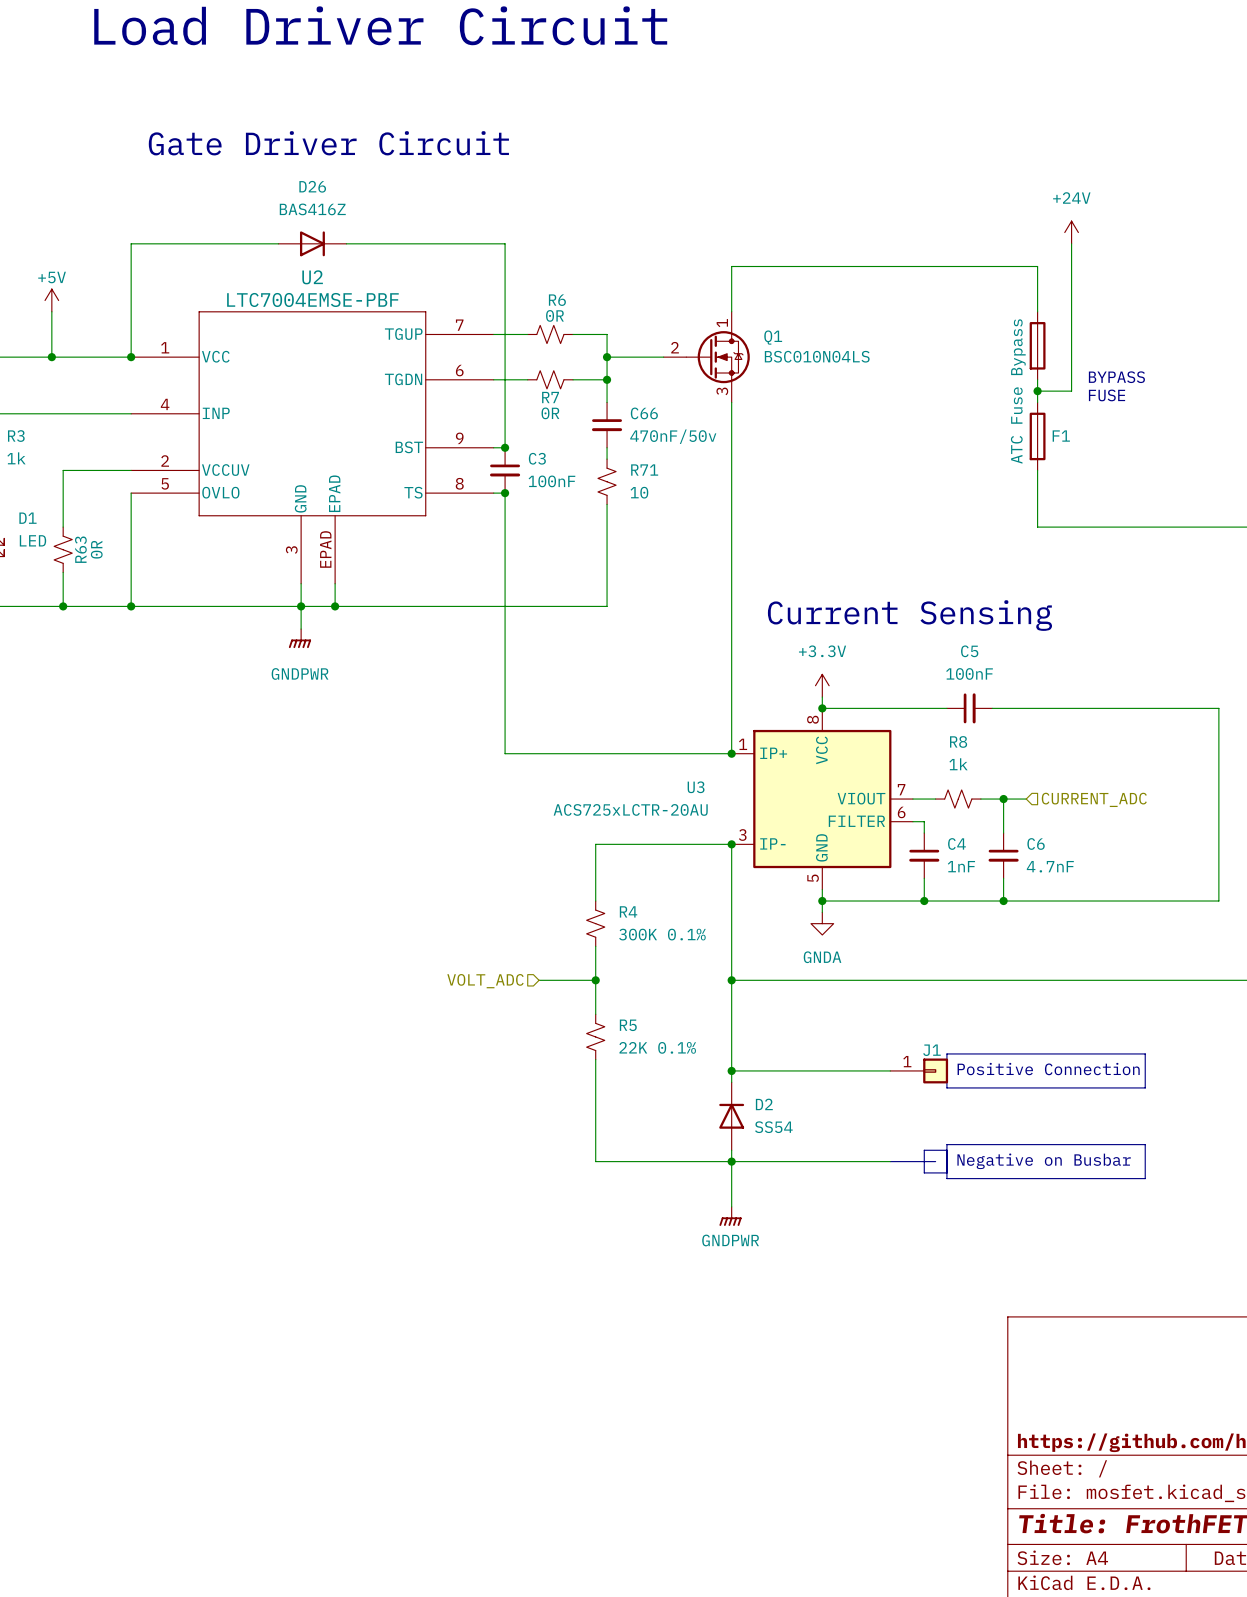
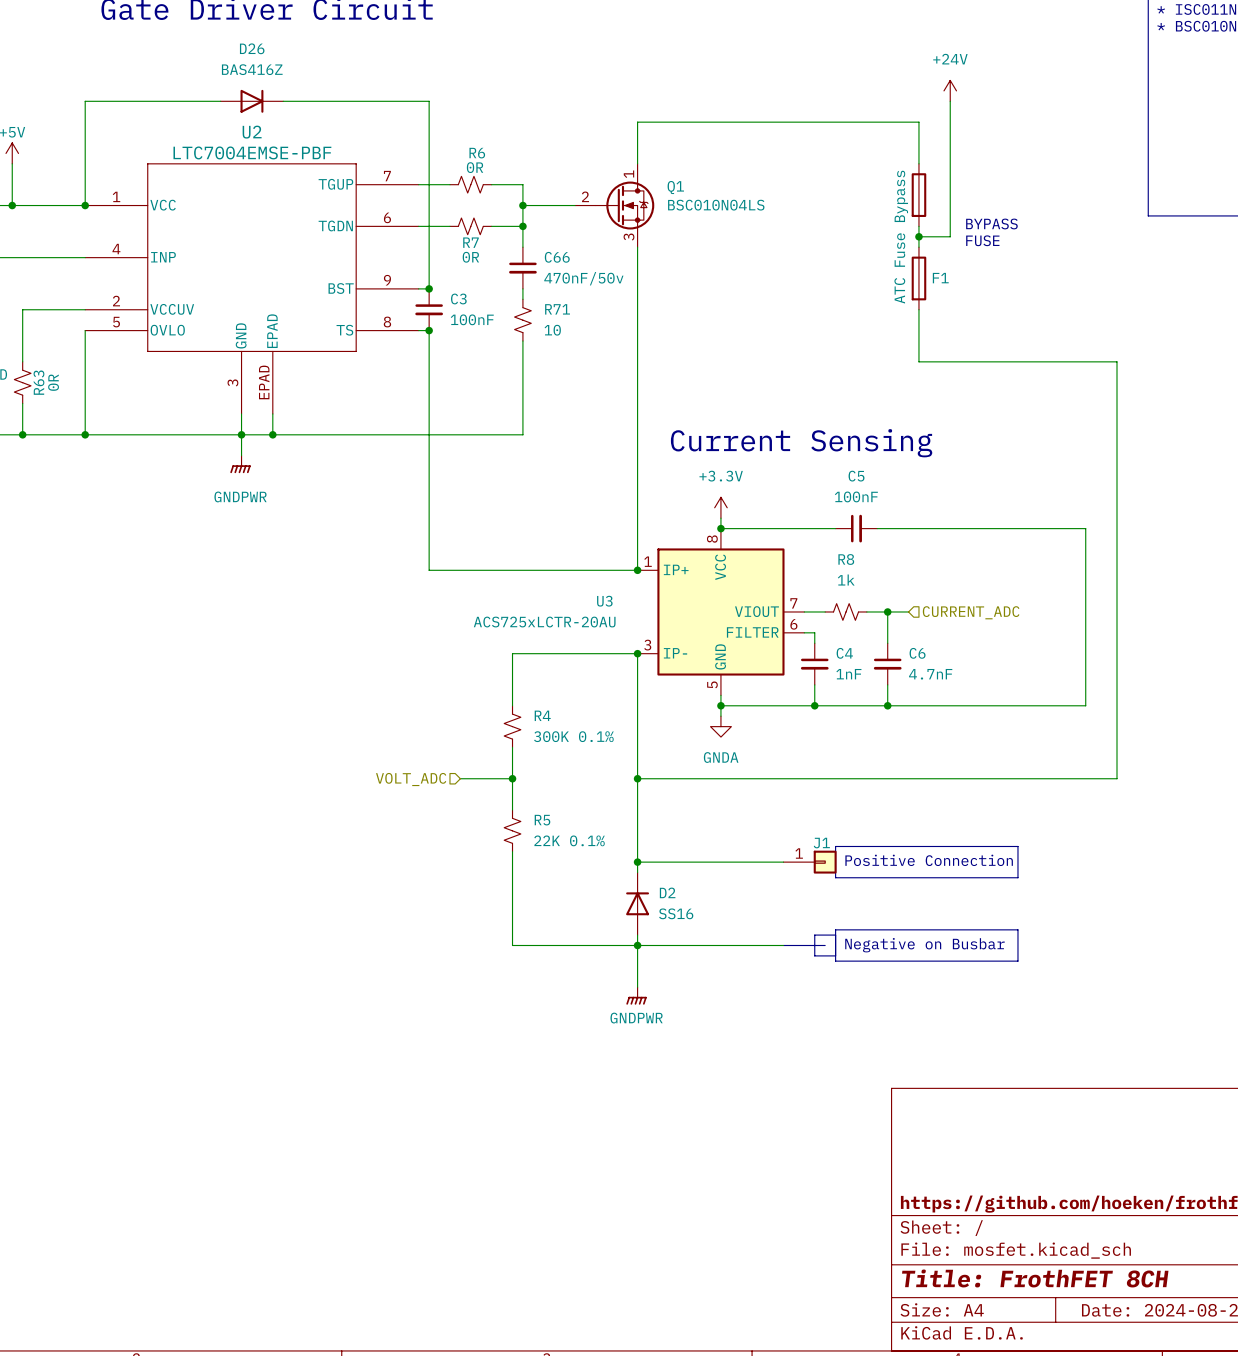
D2 value: SS54 (773, 1127) -> SS16 (676, 913)

